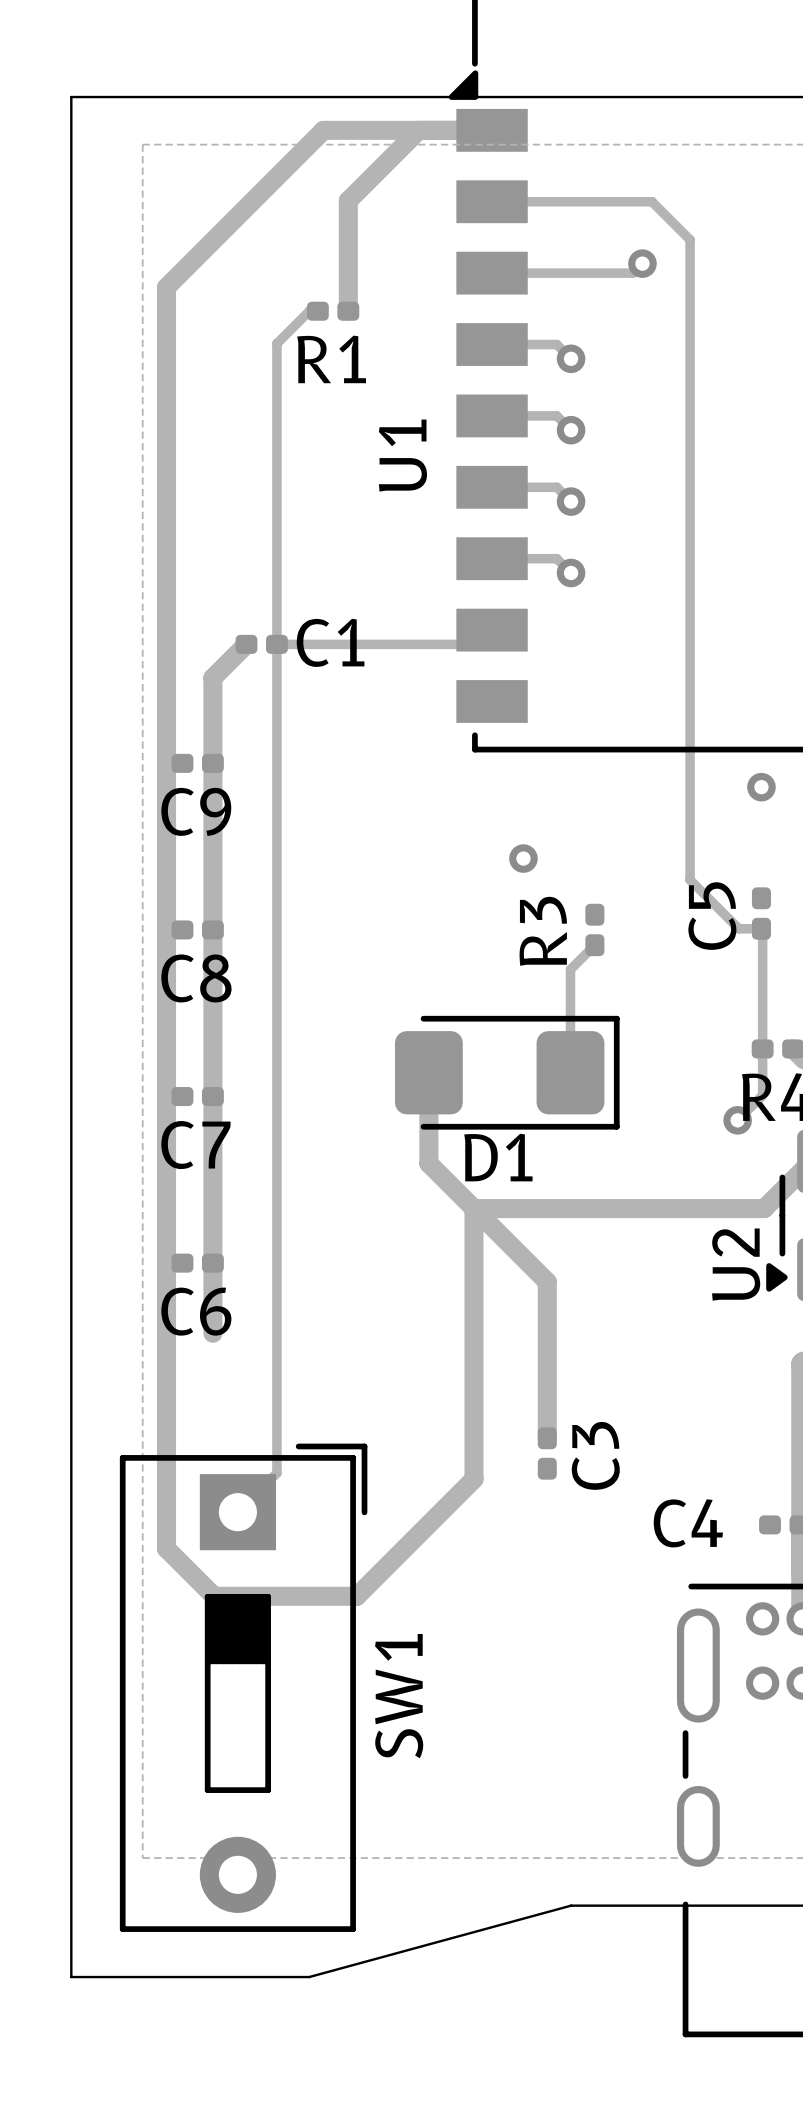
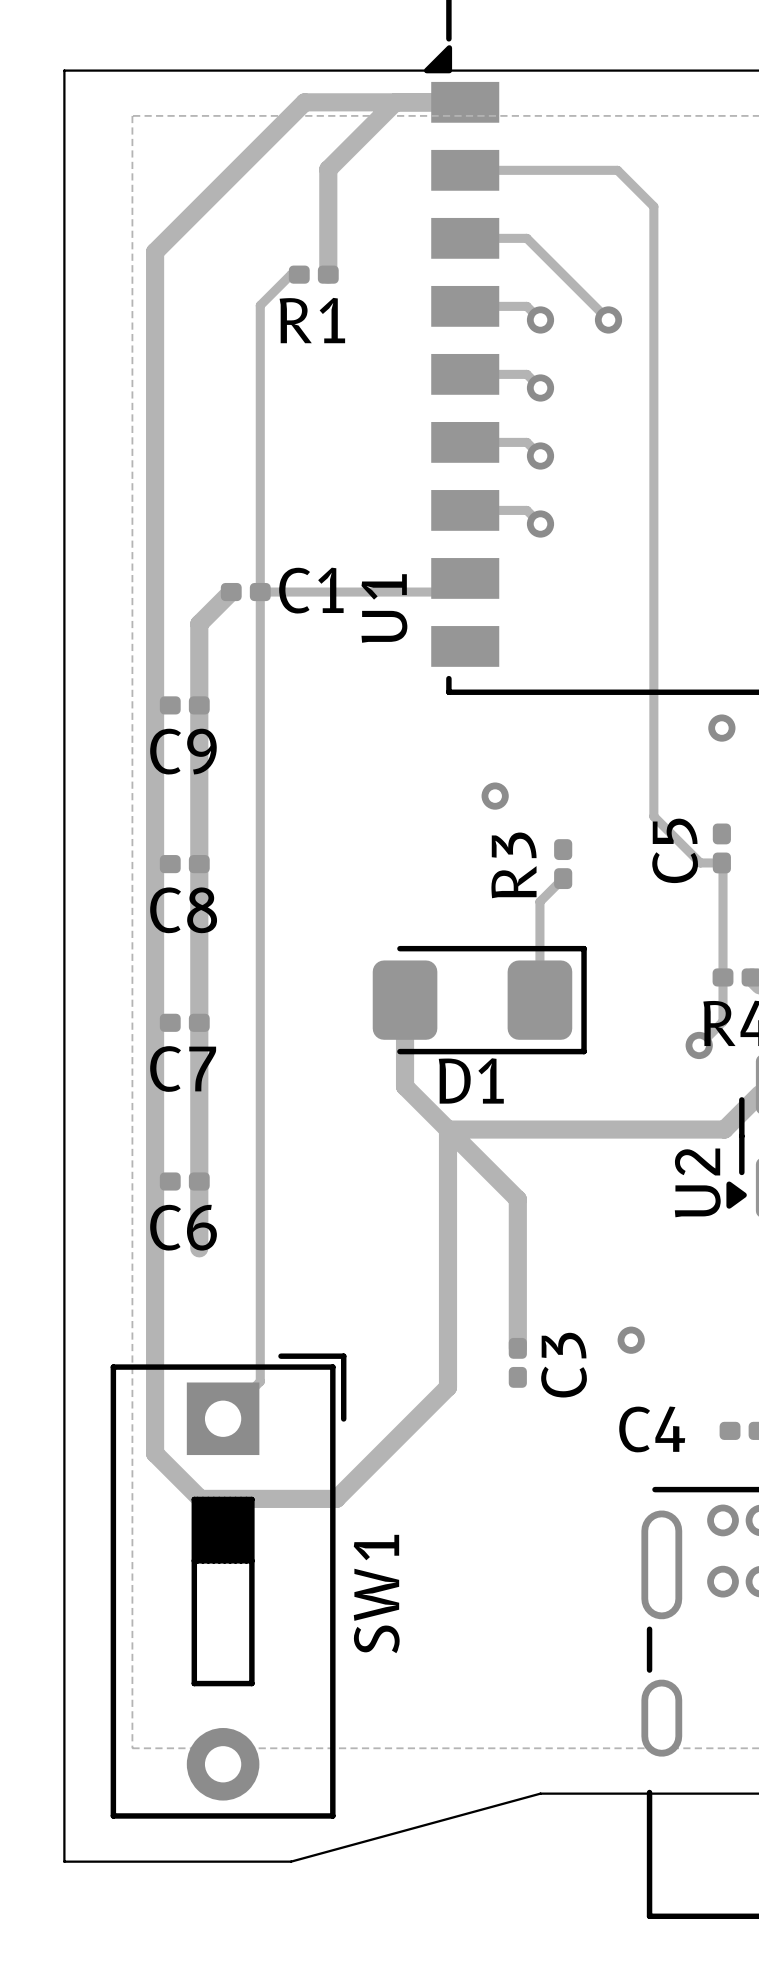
track: (642, 263) (632, 273) (556, 273) -> (608, 319) (526, 238)
via position: (642, 263) -> (608, 319)
U1 name position: U1 (402, 455) -> U1 (384, 608)
via: none -> (631, 1340)

